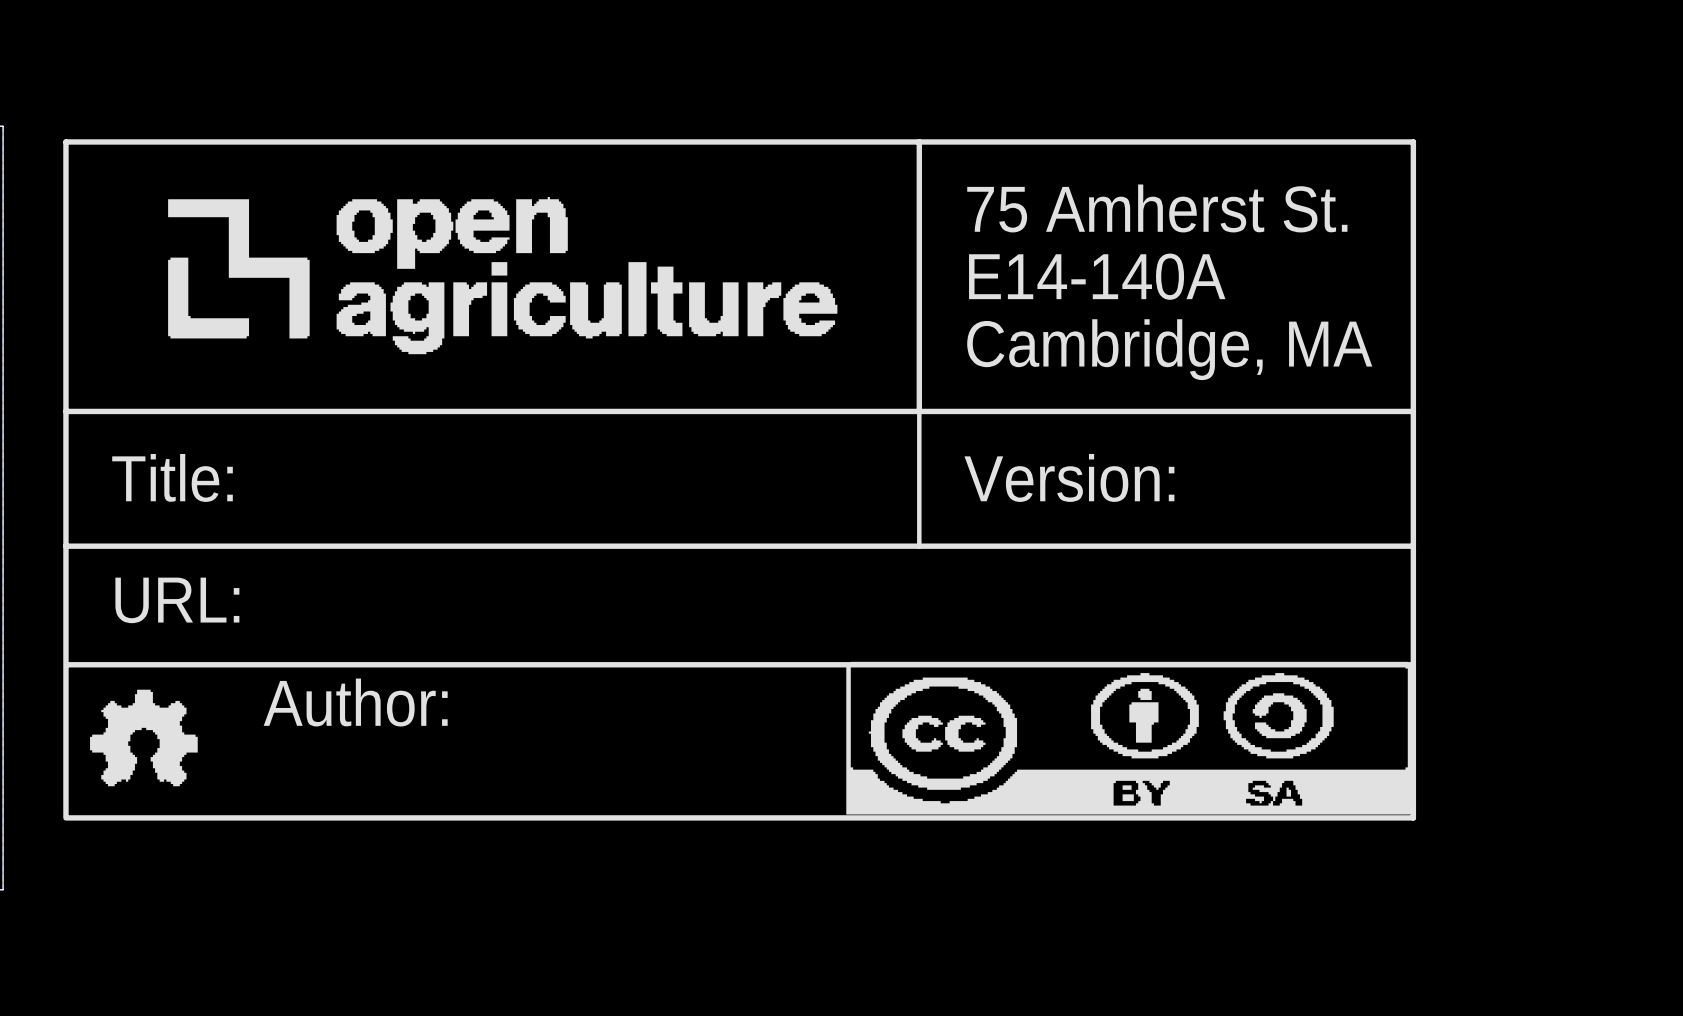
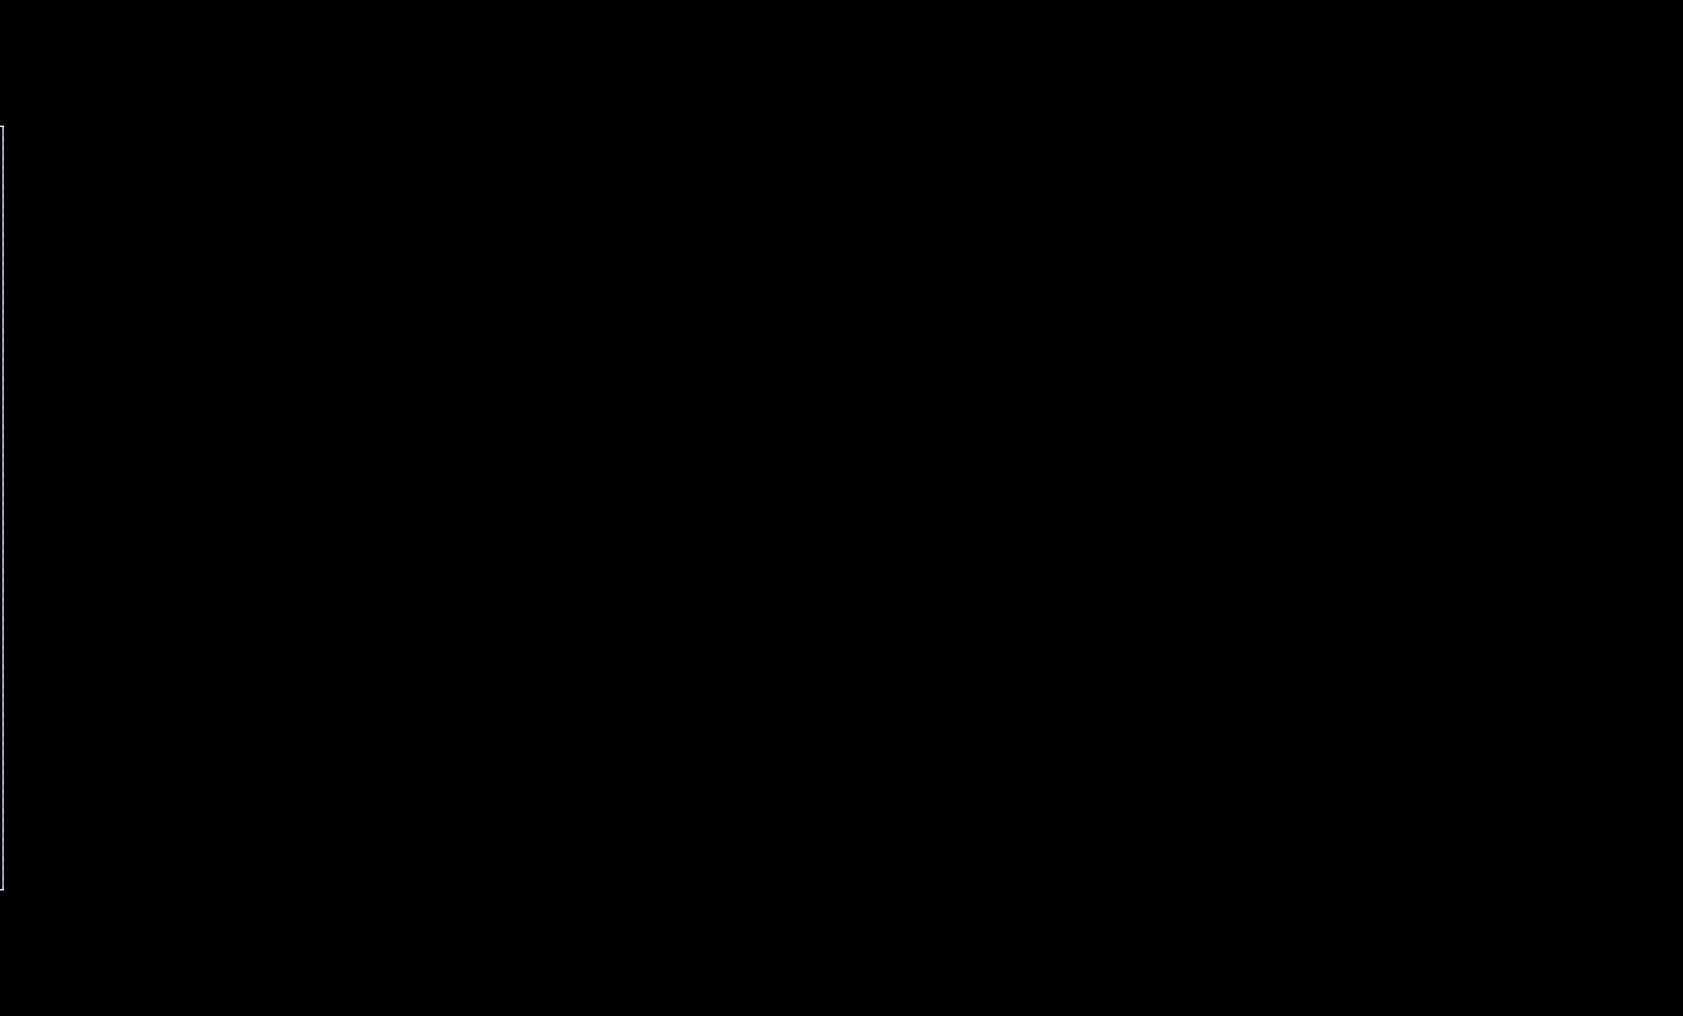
drawing: [63, 139, 1417, 821] -> none

